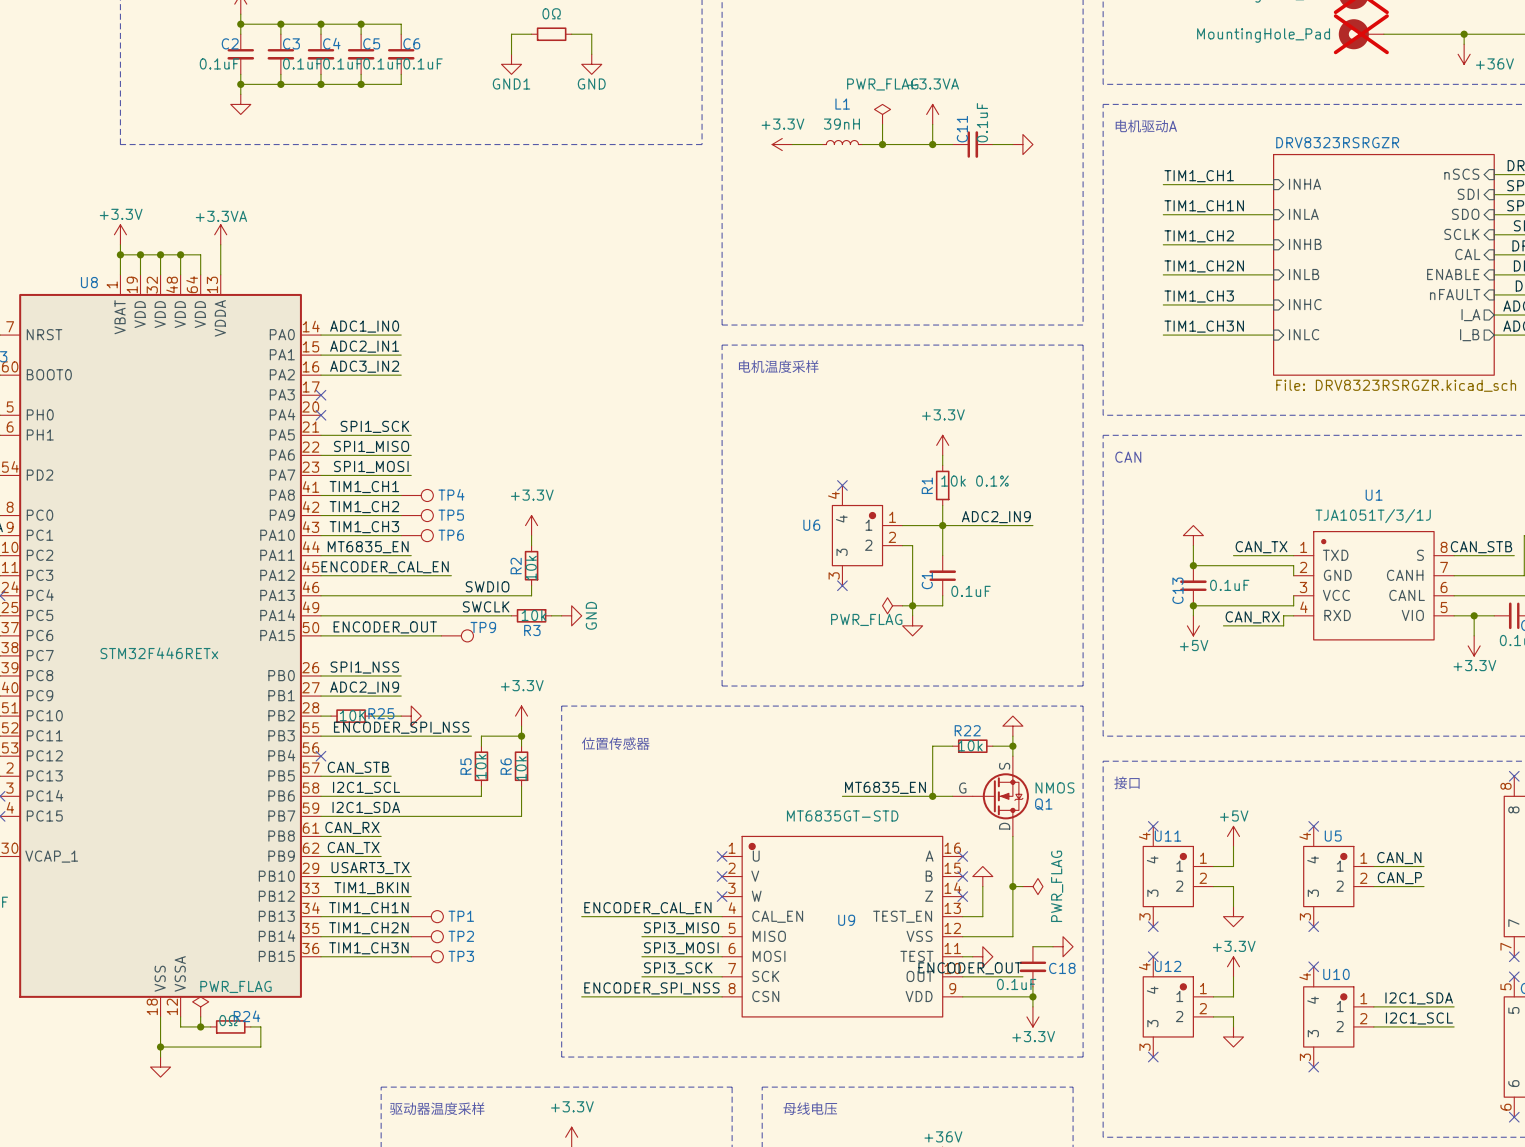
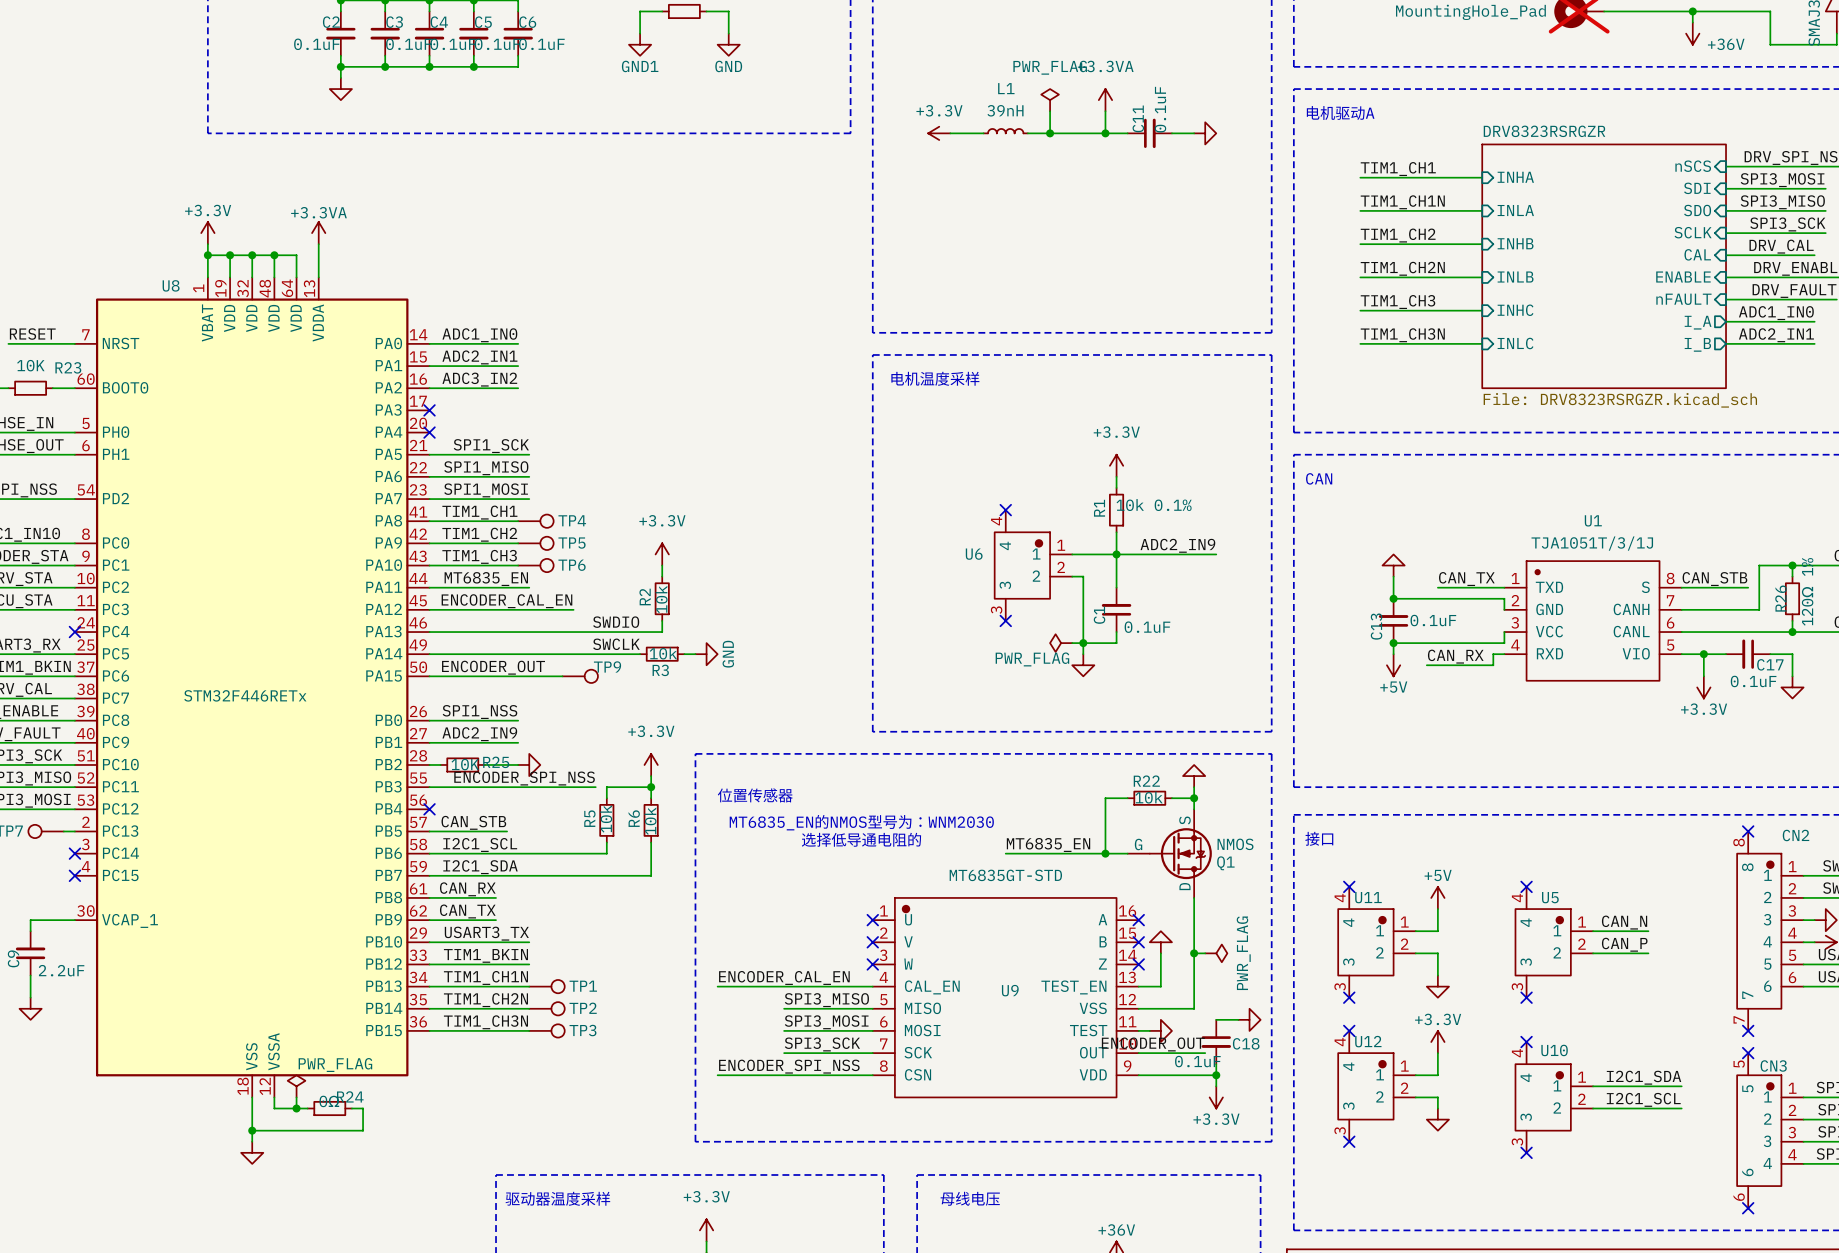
text: none -> MT6835_EN的NMOS型号为：WNM2030 (861, 822)
text: none -> 选择低导通电阻的 (861, 839)

